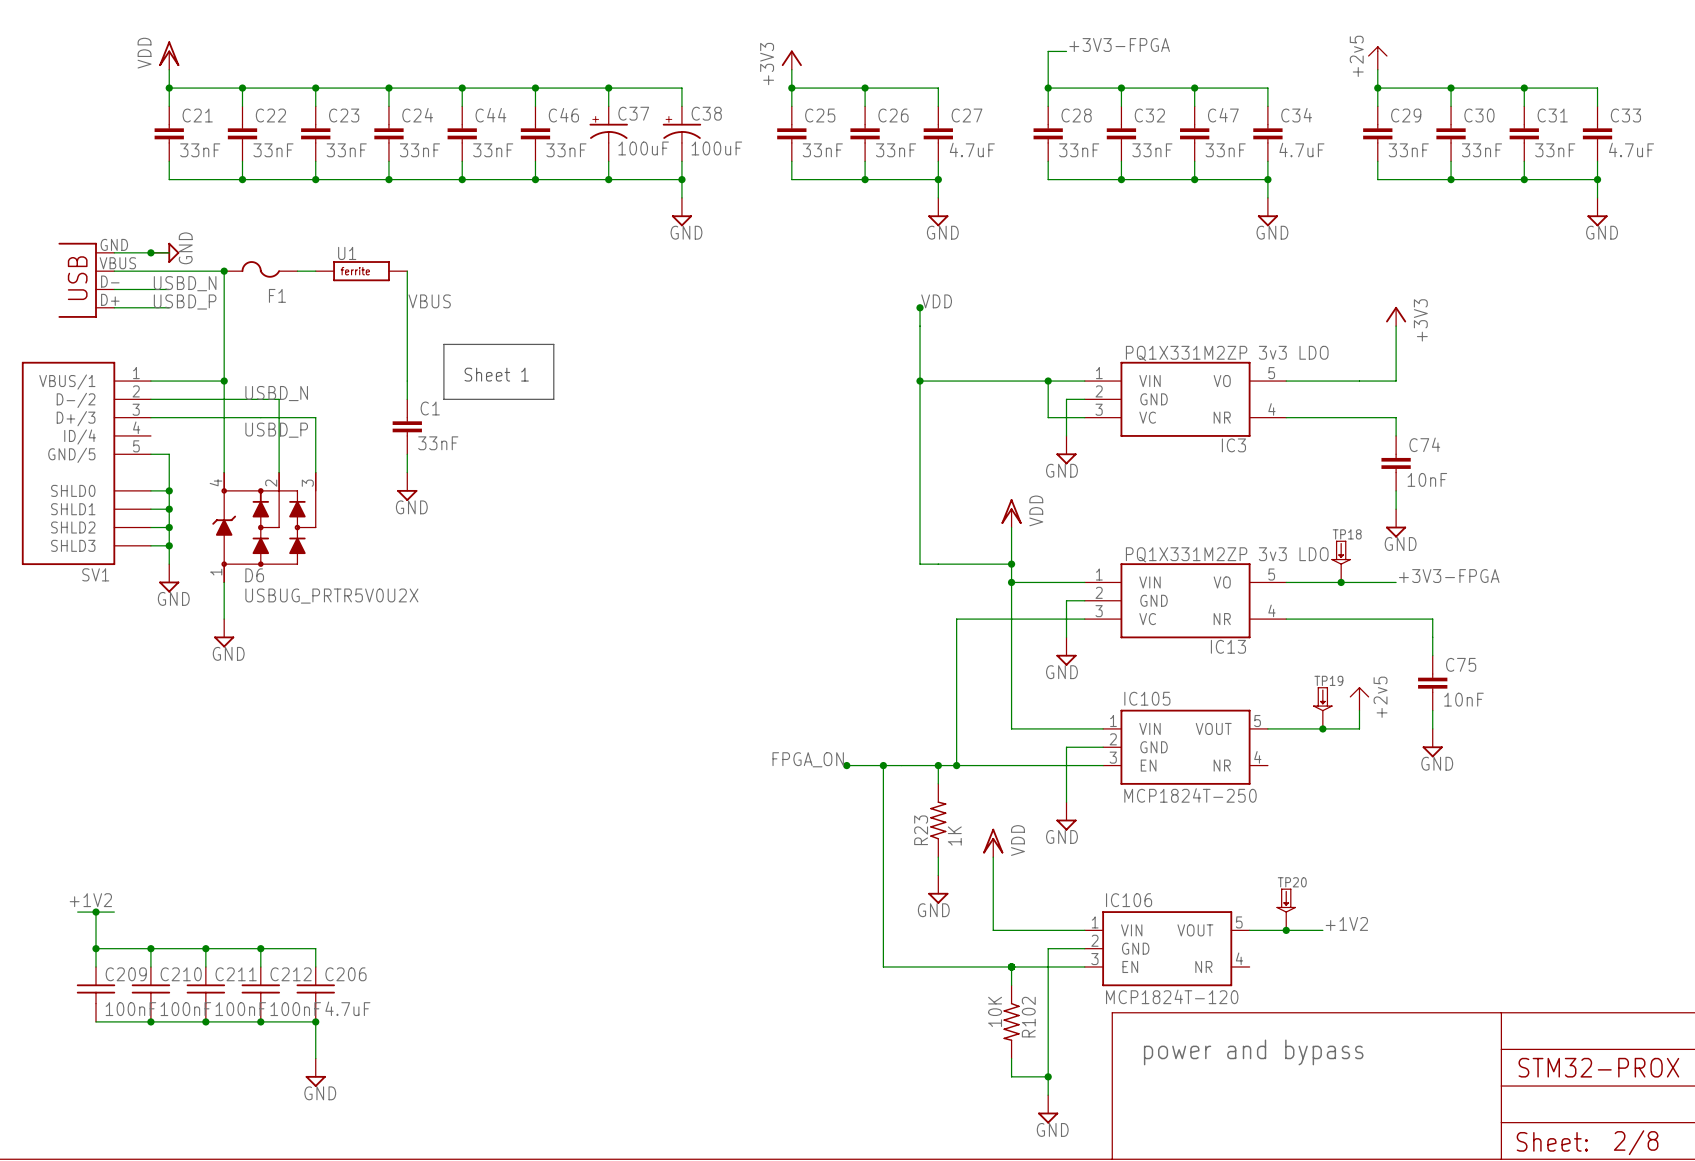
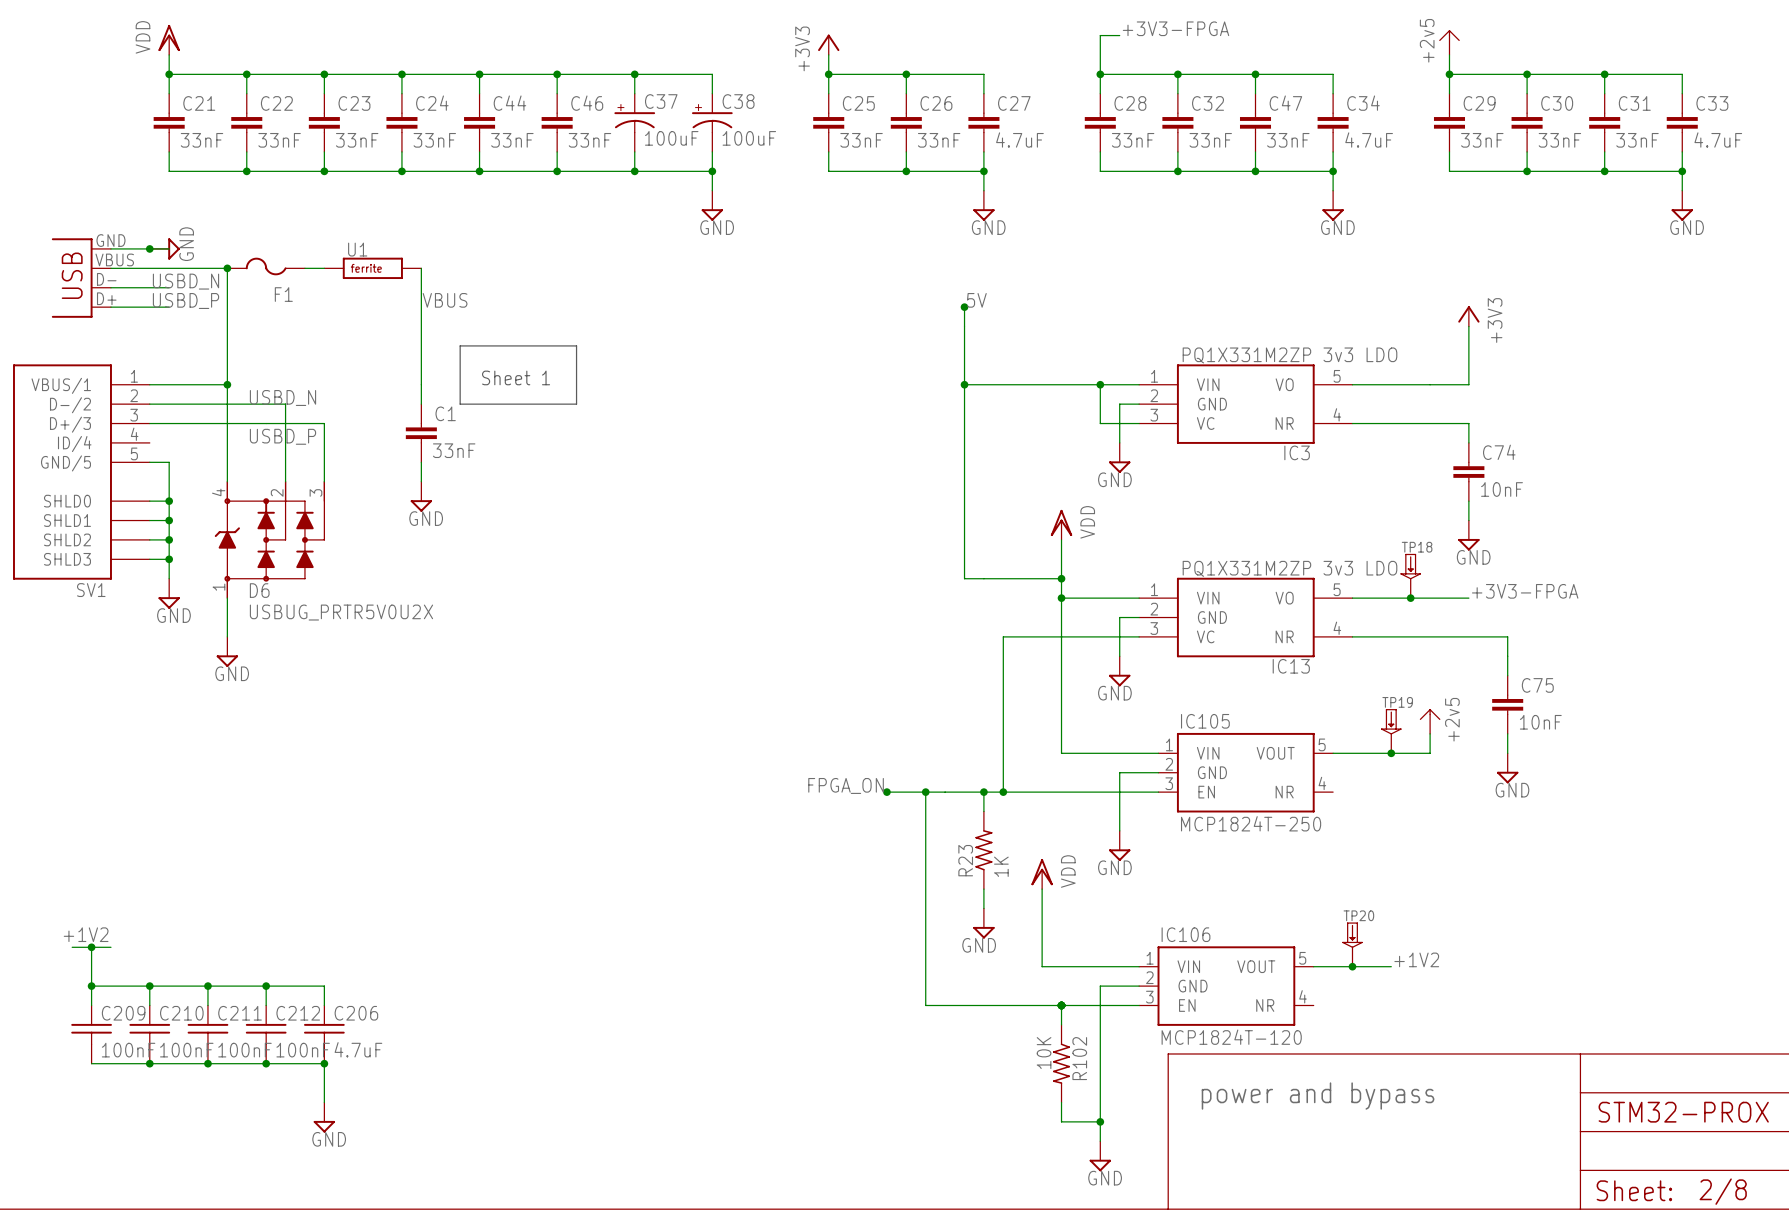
label: VDD (936, 301) -> 5V (976, 300)

